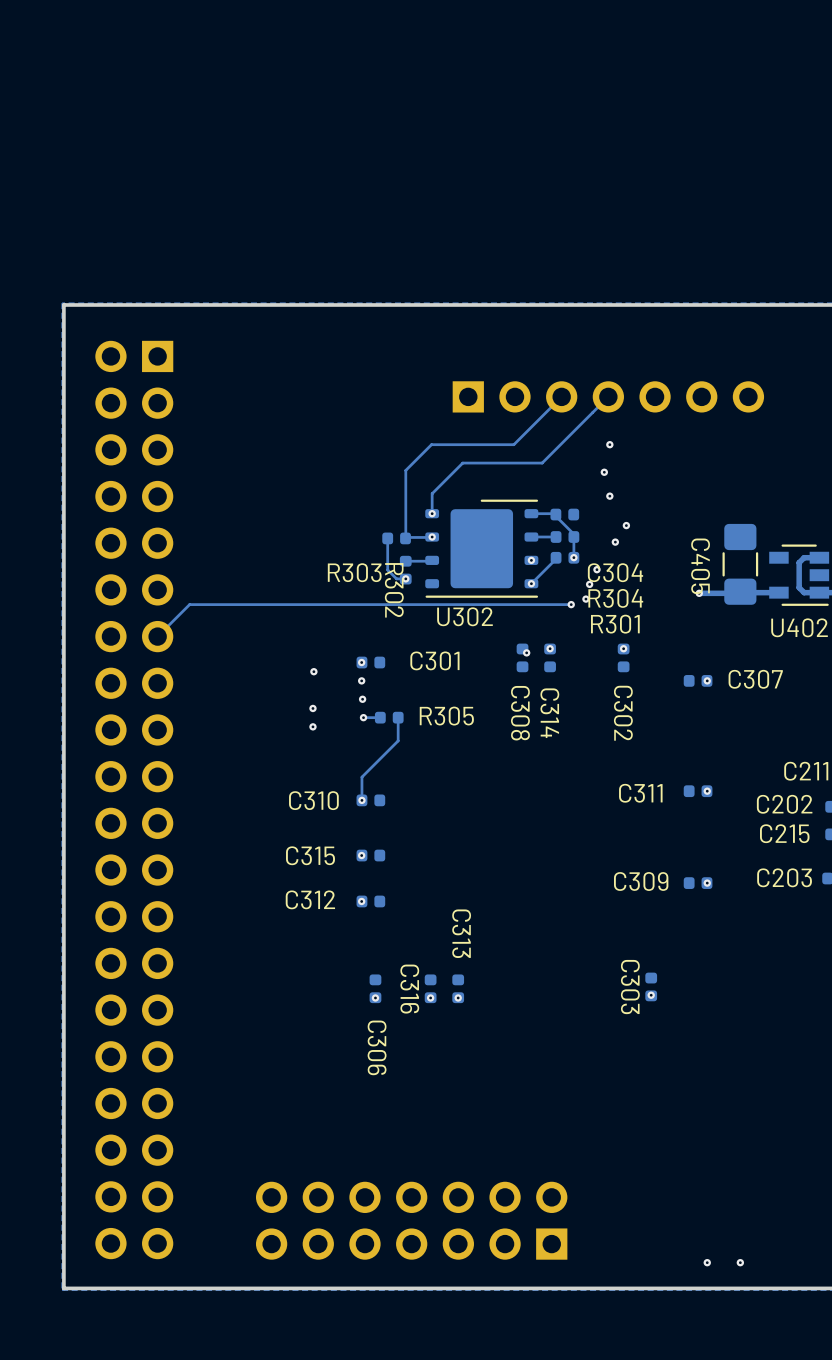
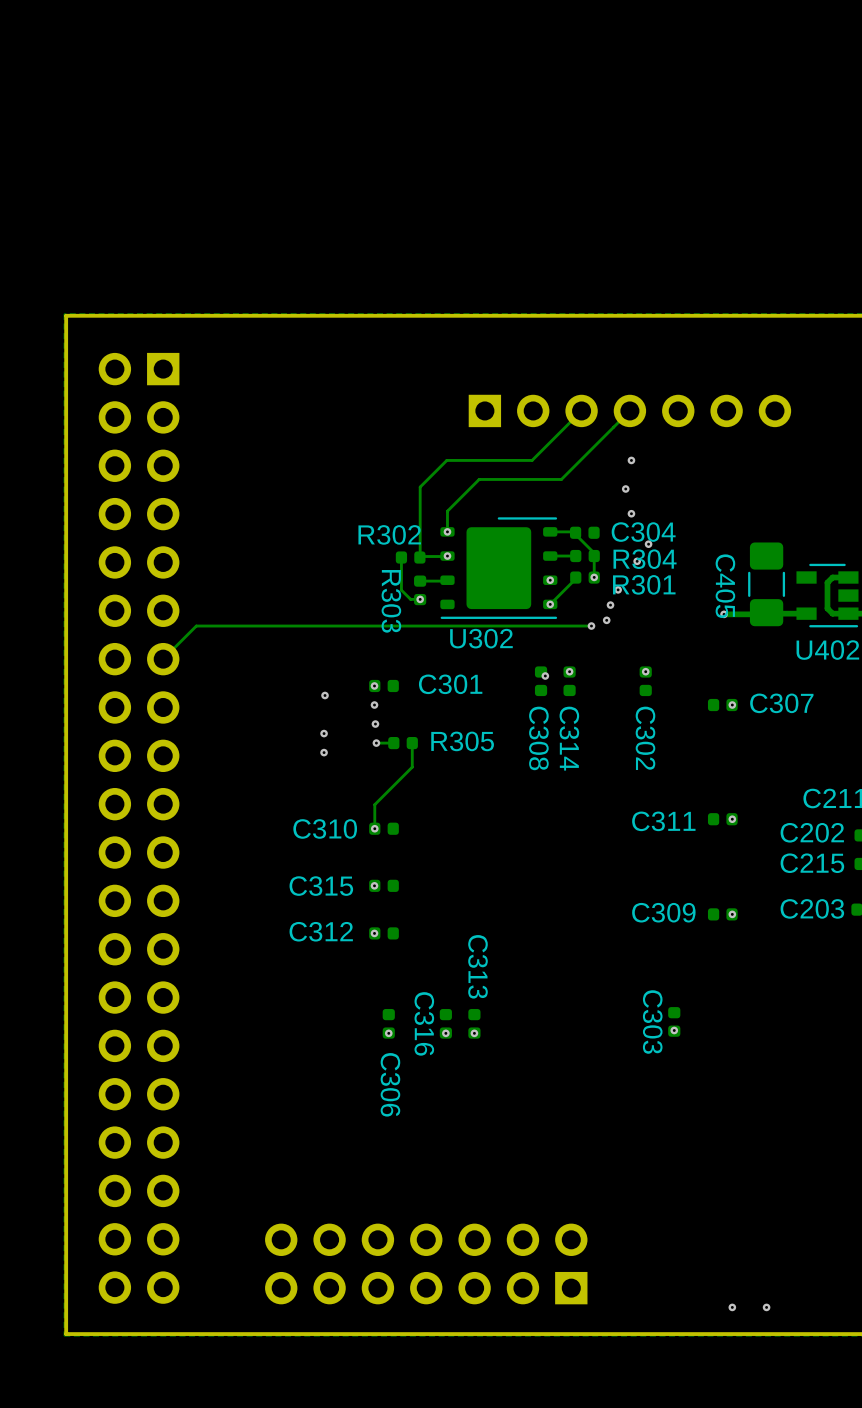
R303 name rotation: 0° (354, 572) -> 90° clockwise (391, 601)
C304 name position: C304 (615, 572) -> C304 (643, 532)
R302 name rotation: 0° (394, 590) -> 90° counterclockwise (389, 534)
R304 name position: R304 (615, 598) -> R304 (645, 559)
R301 name position: R301 (615, 624) -> R301 (644, 584)

